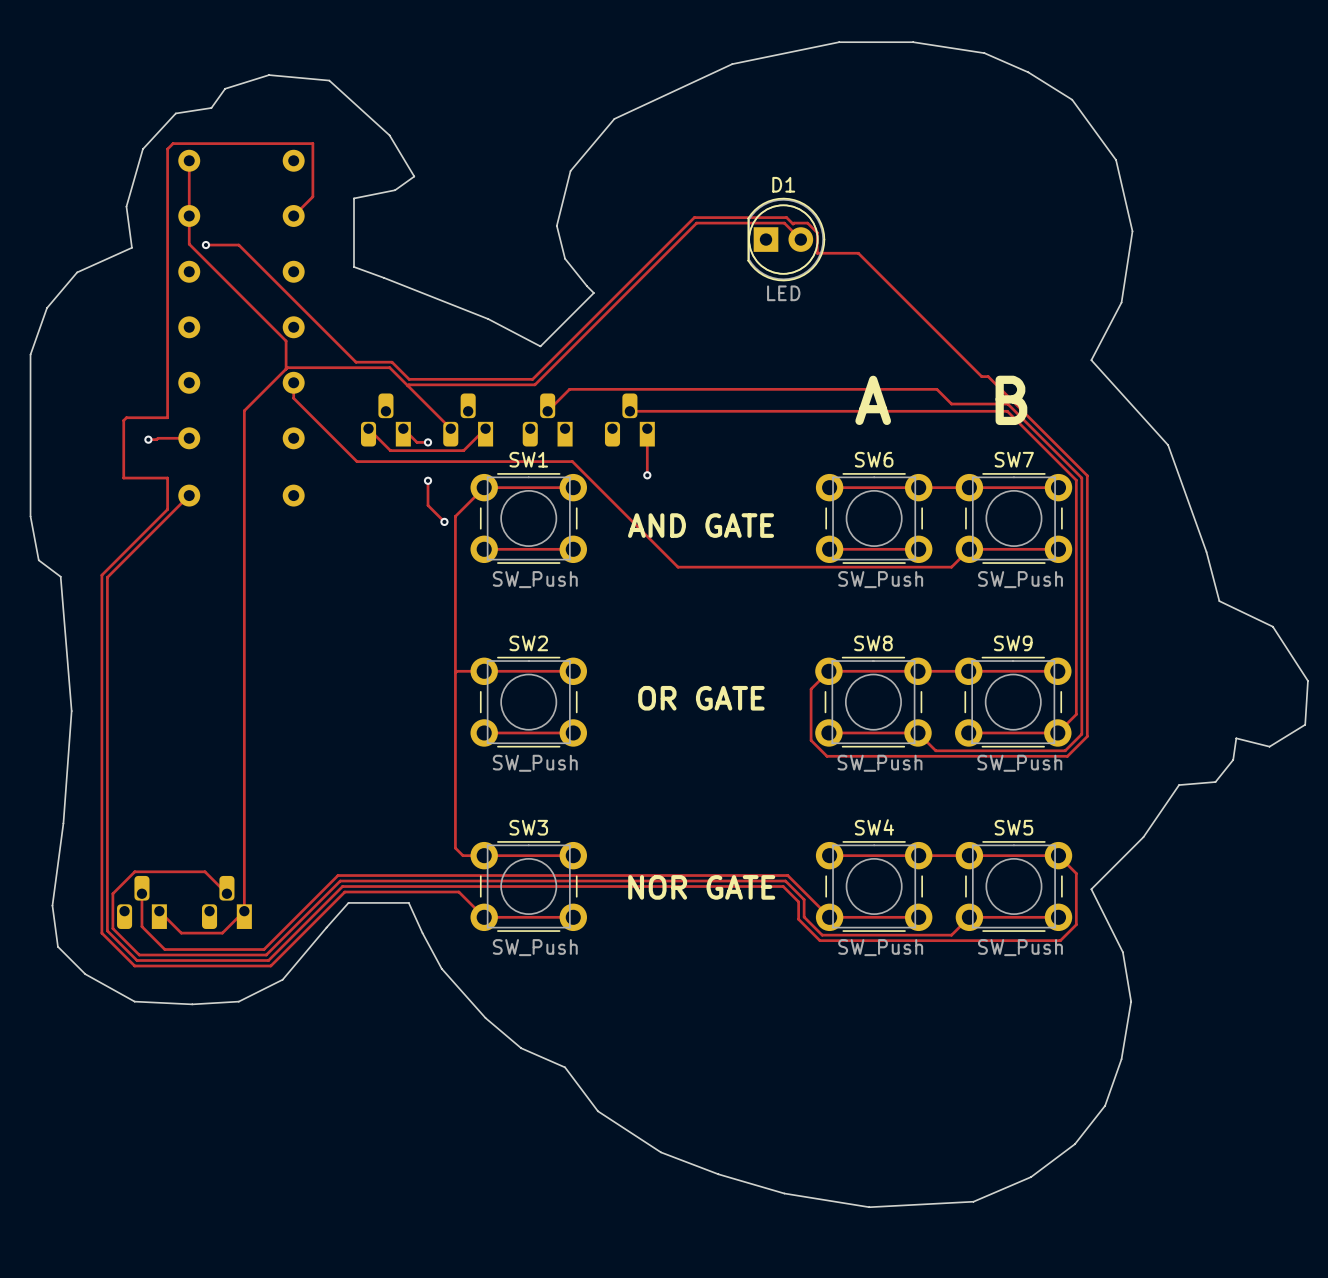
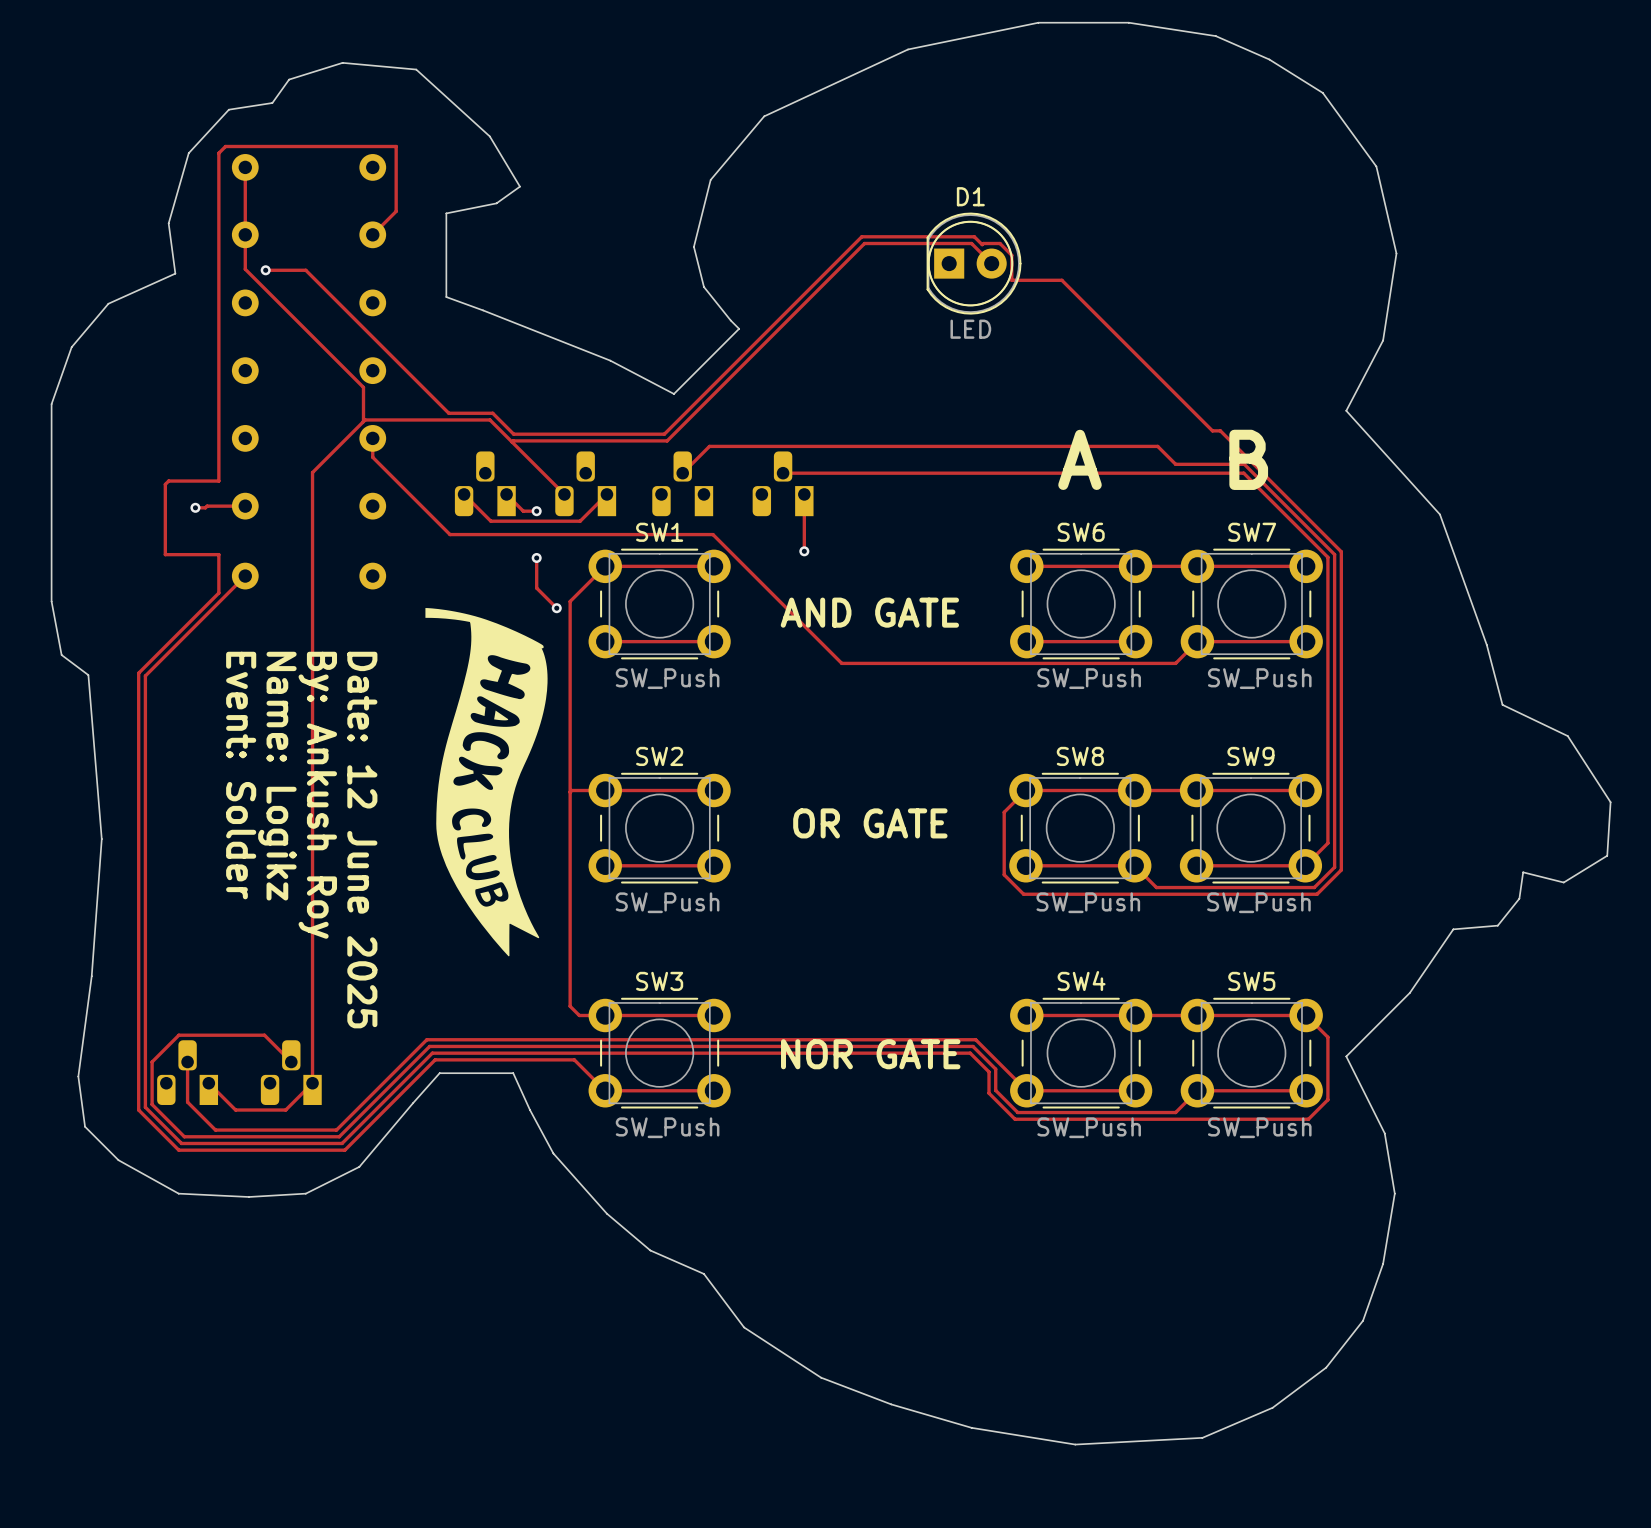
drawing: none -> [425, 608, 548, 957]
text: none -> Event: Solder (241, 775)
text: none -> Name: Logikz (277, 776)
text: none -> By: Ankush Roy (317, 795)
text: none -> Date: 12 June 2025 (362, 840)

